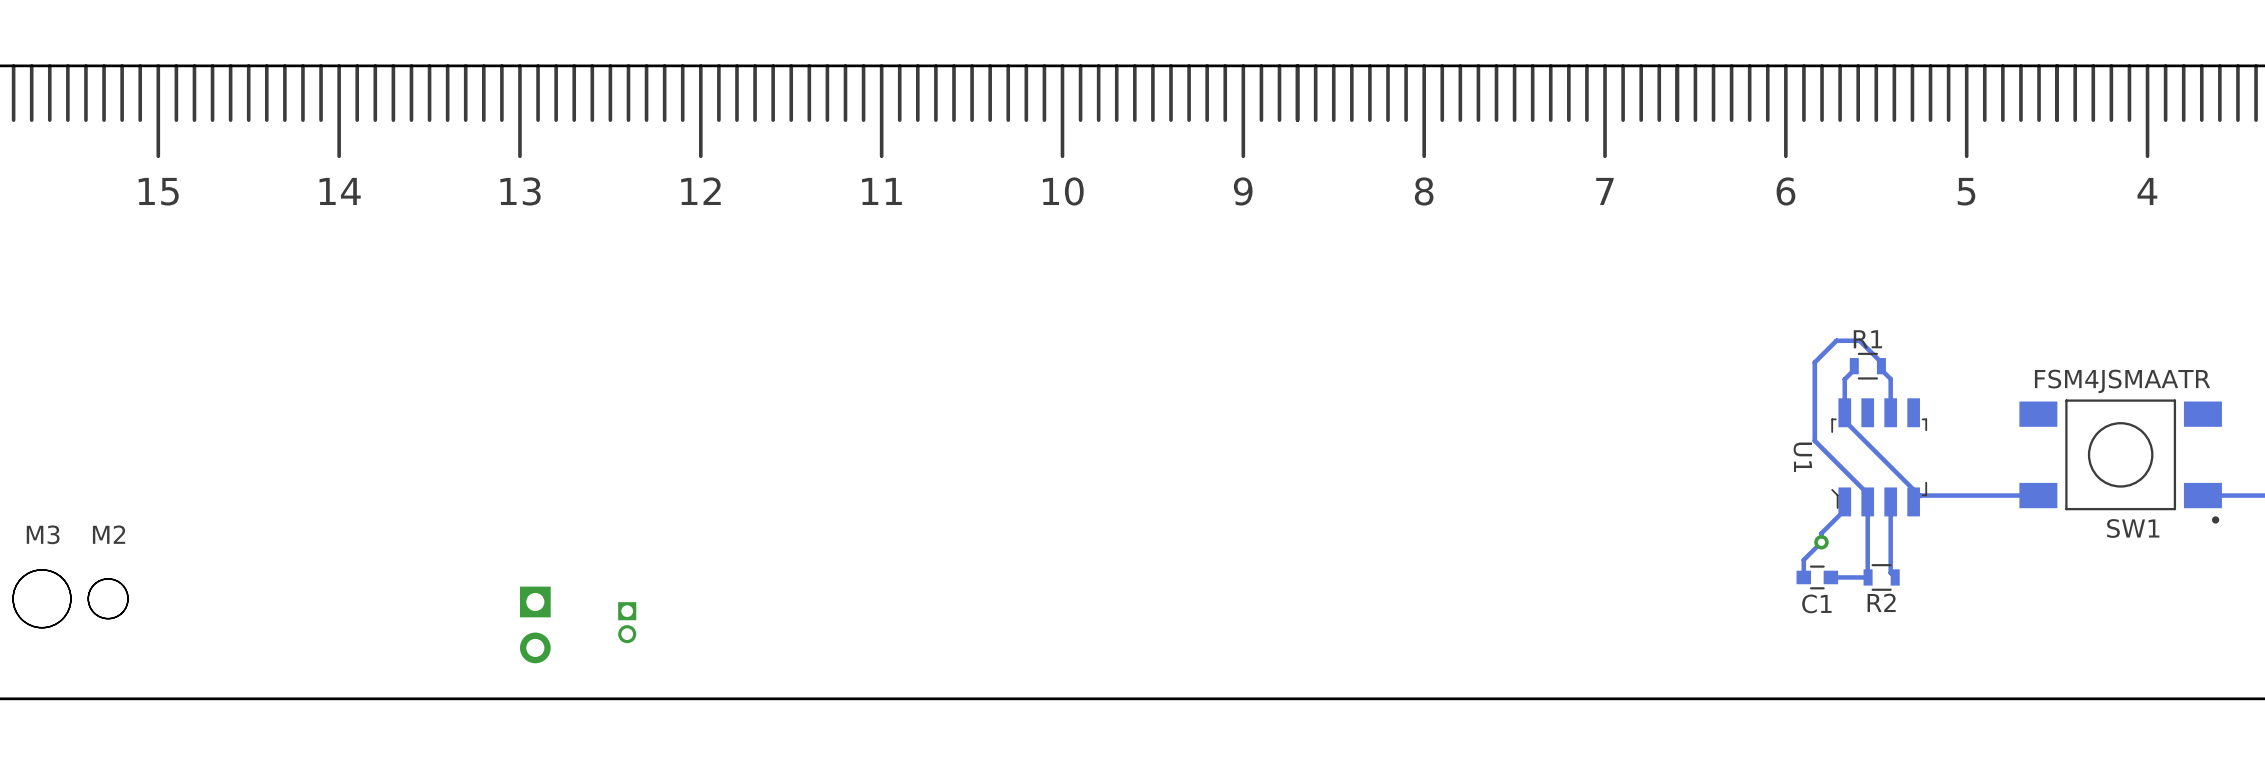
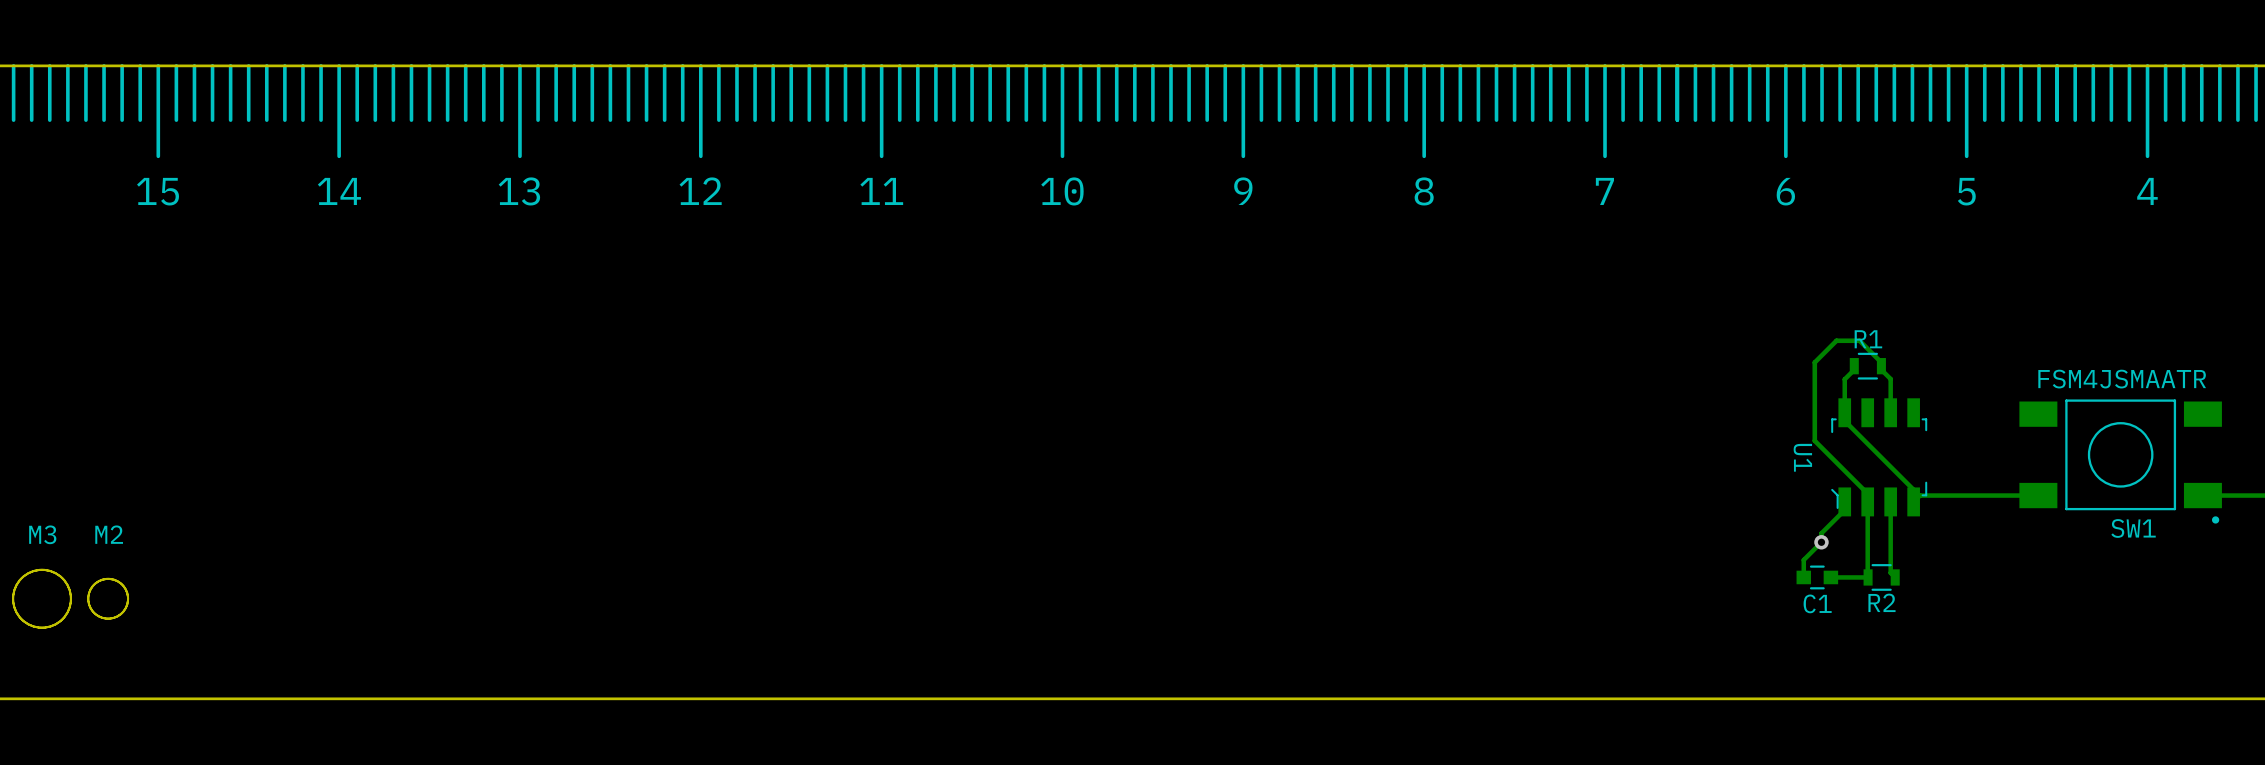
part: (627, 622) -> none
part: (535, 624) -> none

